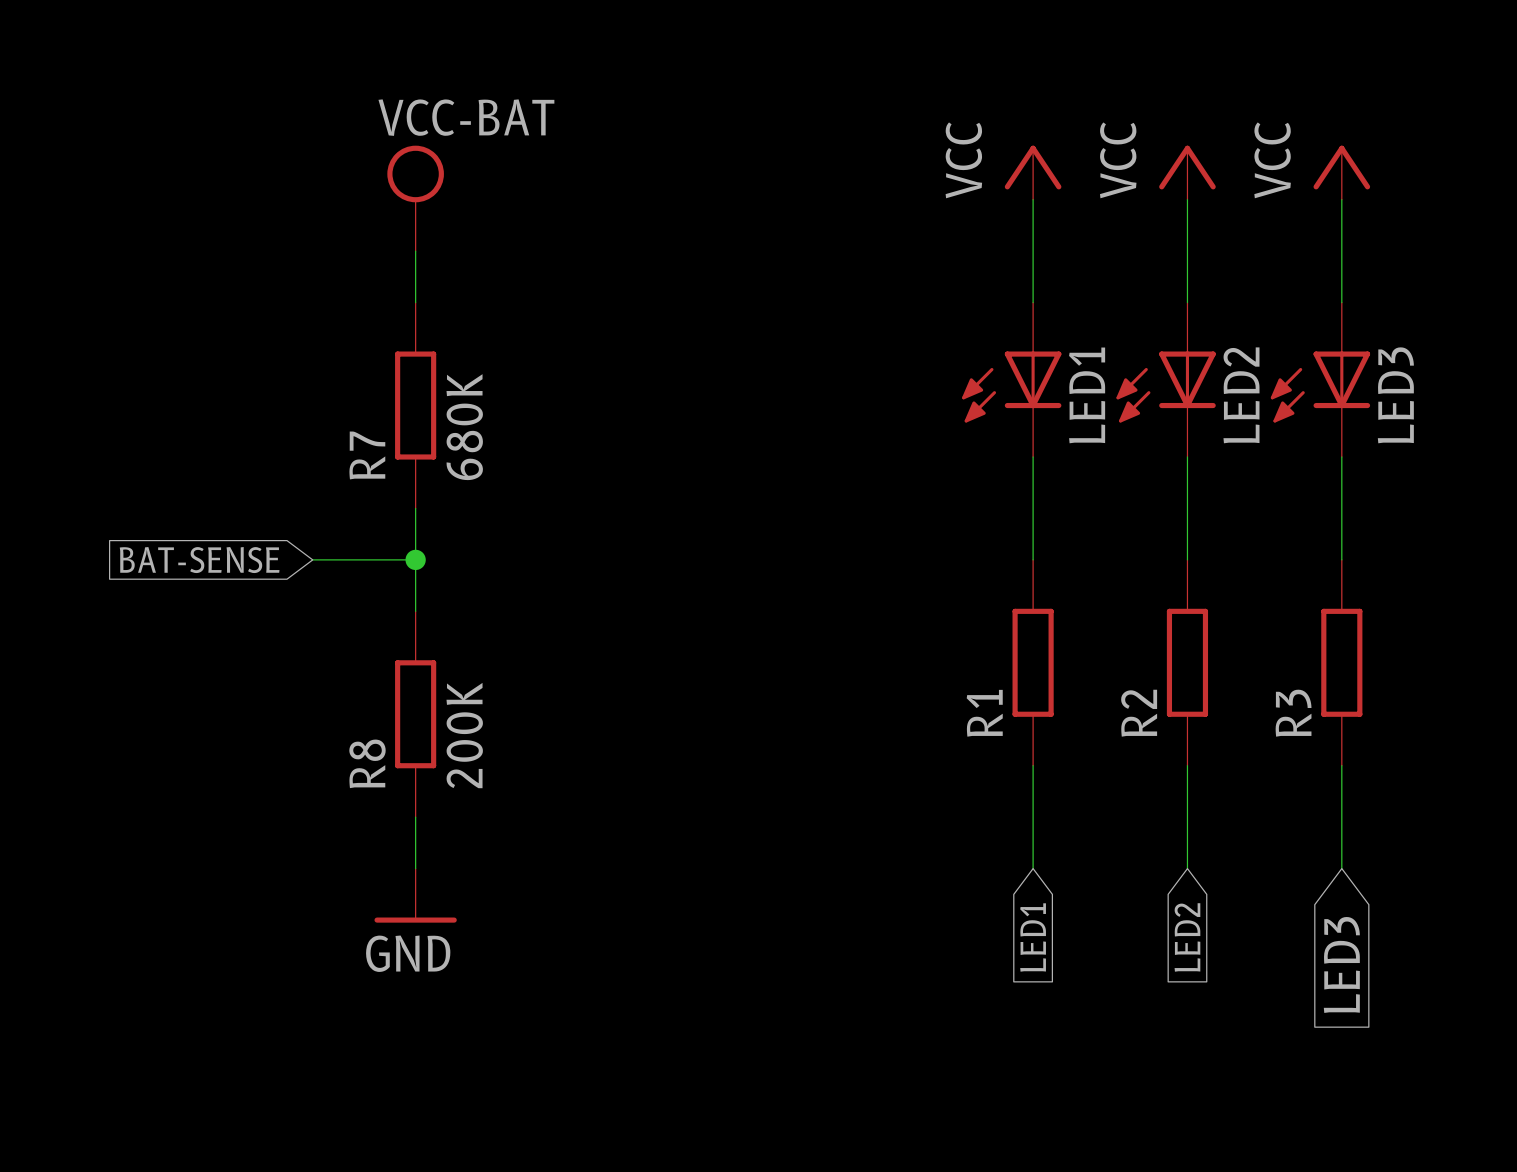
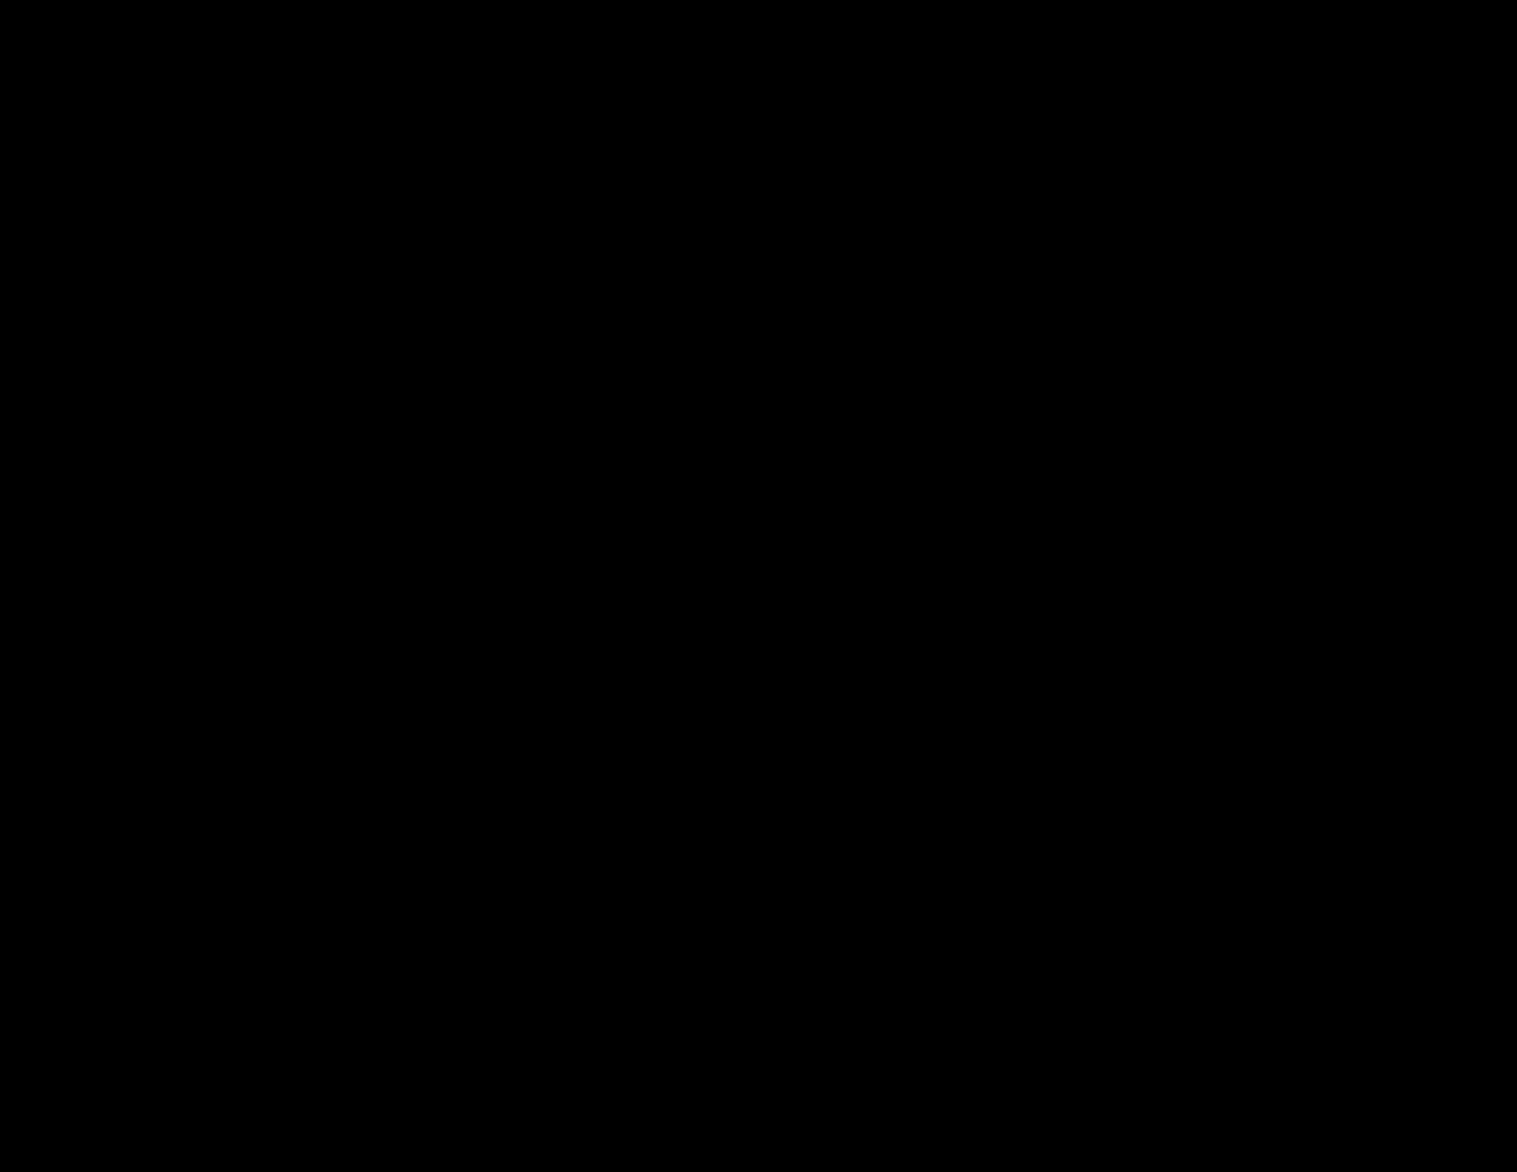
power symbol: VCC (1033, 172) -> none
power symbol: VCC (1187, 172) -> none
power symbol: VCC (1341, 172) -> none
power symbol: VCC-BAT (415, 198) -> none
wire: (1033, 199) (1033, 302) -> none
wire: (1187, 199) (1187, 302) -> none
wire: (1341, 199) (1341, 302) -> none
wire: (415, 251) (415, 302) -> none
LED1: (1011, 379) -> none
LED2: (1166, 379) -> none
LED3: (1320, 379) -> none
R7: 680K (415, 405) -> none
wire: (1033, 456) (1033, 559) -> none
wire: (1187, 456) (1187, 559) -> none
wire: (1341, 456) (1341, 559) -> none
wire: (415, 508) (415, 611) -> none
wire: (312, 559) (415, 559) -> none
junction: (415, 559) -> none
global label: BAT-SENSE (199, 560) -> none
R1: (1033, 662) -> none
R2: (1187, 662) -> none
R3: (1341, 662) -> none
R8: 200K (415, 714) -> none
wire: (1033, 765) (1033, 868) -> none
wire: (1187, 765) (1187, 868) -> none
wire: (1341, 765) (1341, 868) -> none
wire: (415, 817) (415, 868) -> none
power symbol: GND (415, 895) -> none
global label: LED1 (1033, 937) -> none
global label: LED2 (1187, 937) -> none
global label: LED3 (1341, 964) -> none

